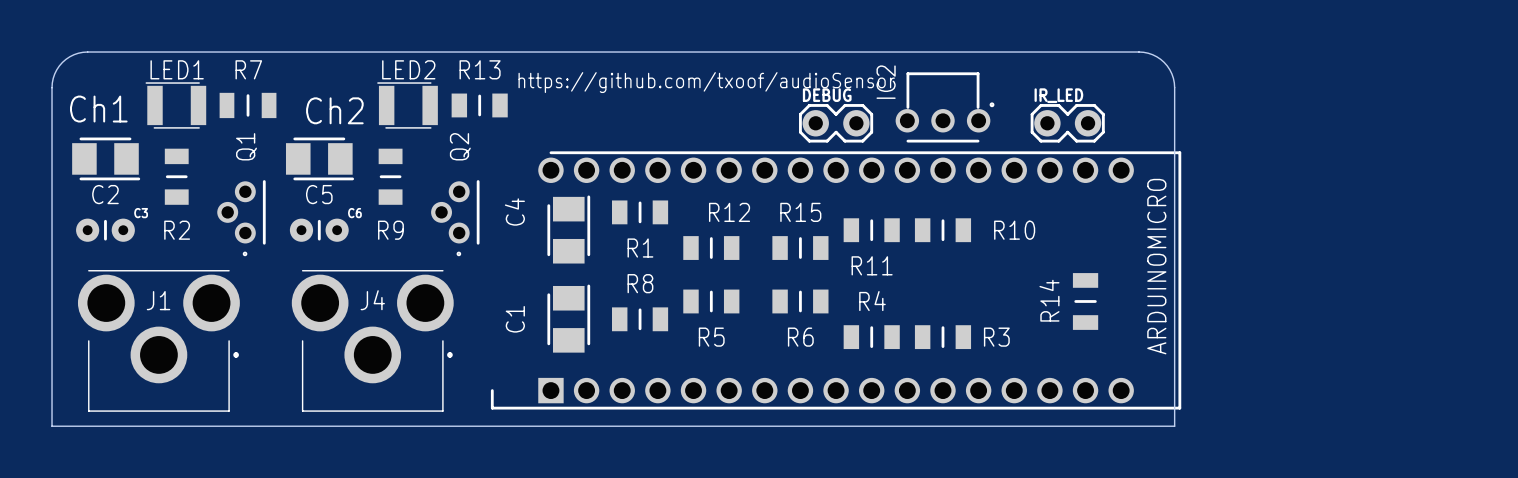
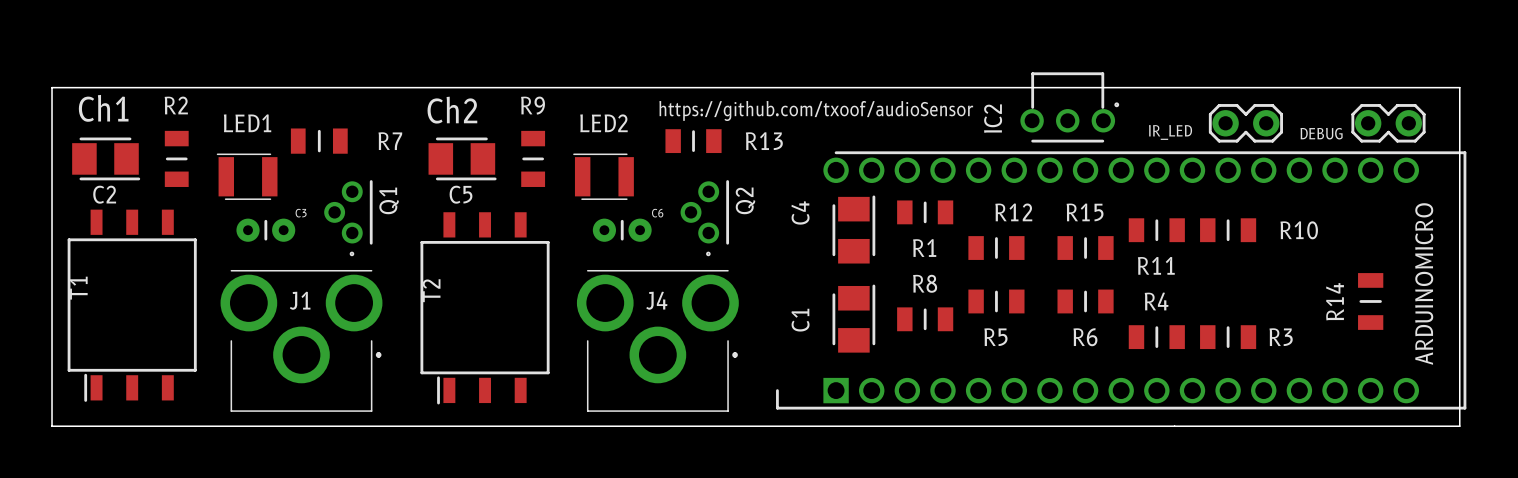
LED1 name position: LED1 (177, 69) -> LED1 (247, 123)
R7 name position: R7 (248, 69) -> R7 (390, 141)
LED2 name position: LED2 (408, 69) -> LED2 (603, 123)
R13 name position: R13 (480, 69) -> R13 (764, 141)
text position: https://github.com/txoof/audioSensor (706, 82) -> https://github.com/txoof/audioSensor (816, 110)
IC2 name position: IC2 (886, 82) -> IC2 (993, 118)
board edge: (52, 87) (54, 74) (62, 62) (74, 54) (87, 52) (1148, 53) (1164, 62) (1171, 74) (1174, 82) (1174, 426) -> (52, 87) (1459, 87) (1459, 426) (1174, 426)
IR_LED name position: IR_LED (1058, 95) -> IR_LED (1170, 132)
LED1 position: (175, 105) -> (247, 176)
R7 position: (248, 105) -> (319, 141)
LED2 position: (407, 105) -> (603, 176)
R13 position: (479, 105) -> (693, 141)
IC2 position: (945, 107) -> (1069, 107)
text position: Ch2 (334, 110) -> Ch2 (452, 110)
DEBUG: (836, 123) -> none
IR_LED position: (1067, 123) -> (1245, 123)
DEBUG: none -> (1388, 123)
Q1 name position: Q1 (246, 146) -> Q1 (389, 200)
Q2 name position: Q2 (460, 146) -> Q2 (745, 200)
C5 position: (320, 158) -> (462, 158)
R2 position: (176, 176) -> (176, 158)
R9 position: (390, 176) -> (533, 158)
R1 position: (640, 212) -> (925, 212)
Q1 position: (241, 218) -> (348, 218)
Q2 position: (455, 218) -> (704, 218)
C4 position: (568, 229) -> (853, 229)
C3 position: (105, 230) -> (265, 230)
R2 name position: R2 (177, 230) -> R2 (176, 105)
C6 position: (319, 230) -> (622, 230)
R9 name position: R9 (390, 230) -> R9 (533, 105)
R11 position: (871, 230) -> (1156, 230)
R10 position: (942, 230) -> (1228, 230)
R12 position: (711, 248) -> (996, 248)
R15 position: (800, 248) -> (1085, 248)
ARDUINOMICRO name position: ARDUINOMICRO (1156, 266) -> ARDUINOMICRO (1424, 283)
ARDUINOMICRO position: (836, 280) -> (1121, 280)
R5 position: (711, 301) -> (996, 301)
R6 position: (800, 301) -> (1085, 301)
R14 position: (1085, 301) -> (1370, 301)
T1: none -> (132, 305)
T2: none -> (485, 308)
C1 position: (568, 318) -> (853, 318)
R8 position: (640, 319) -> (925, 319)
R4 position: (871, 337) -> (1156, 337)
R3 position: (942, 337) -> (1228, 337)
J1 position: (158, 340) -> (301, 340)
J4 position: (372, 340) -> (657, 340)

